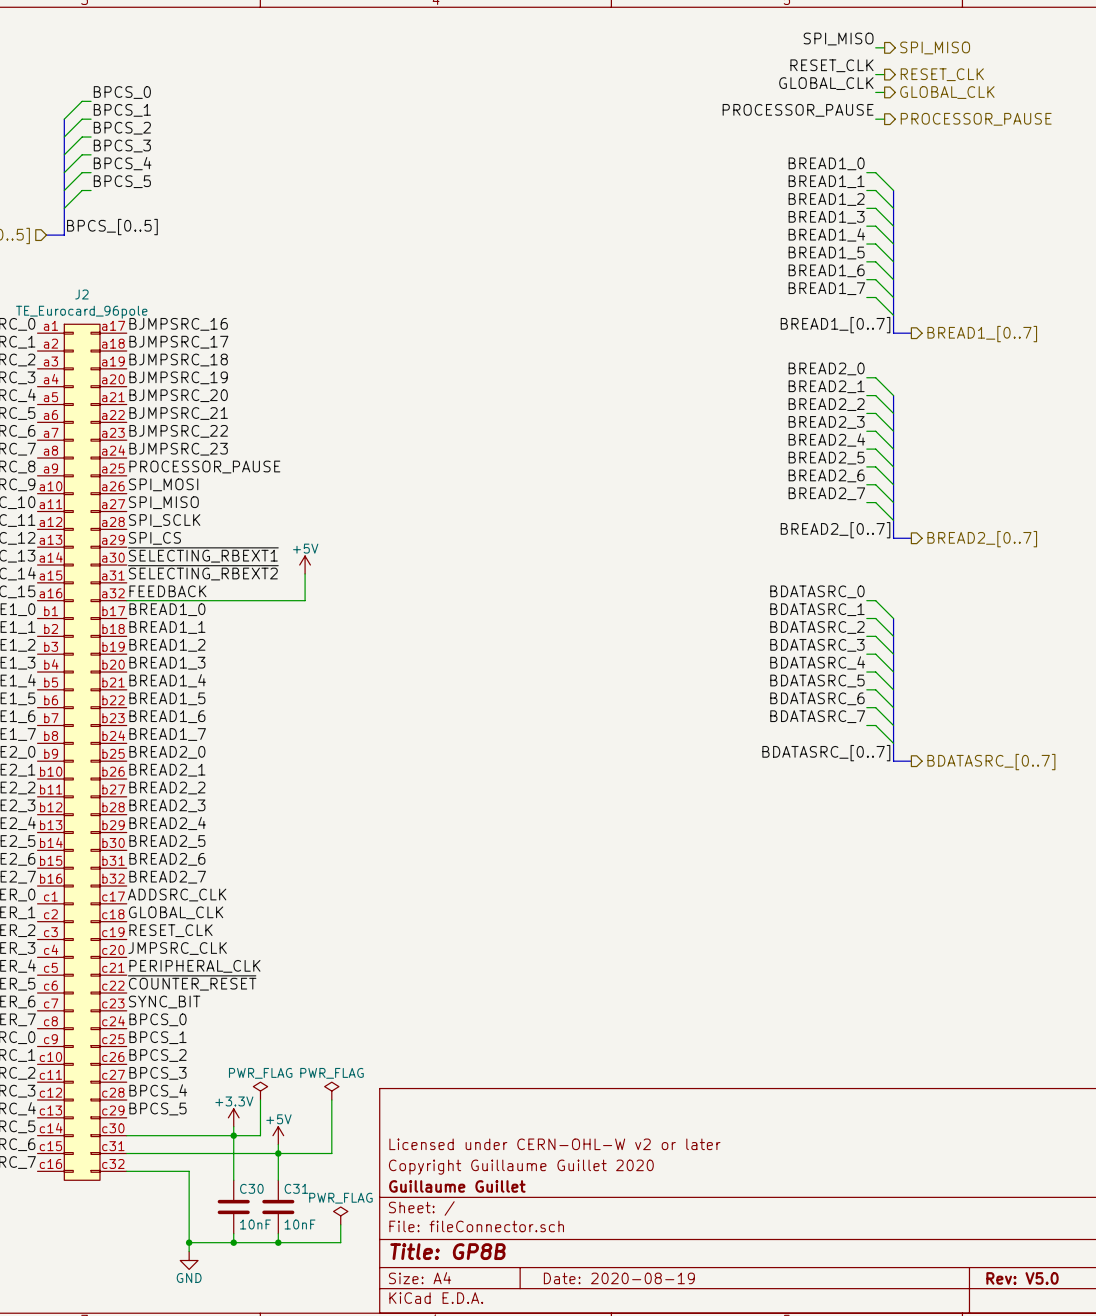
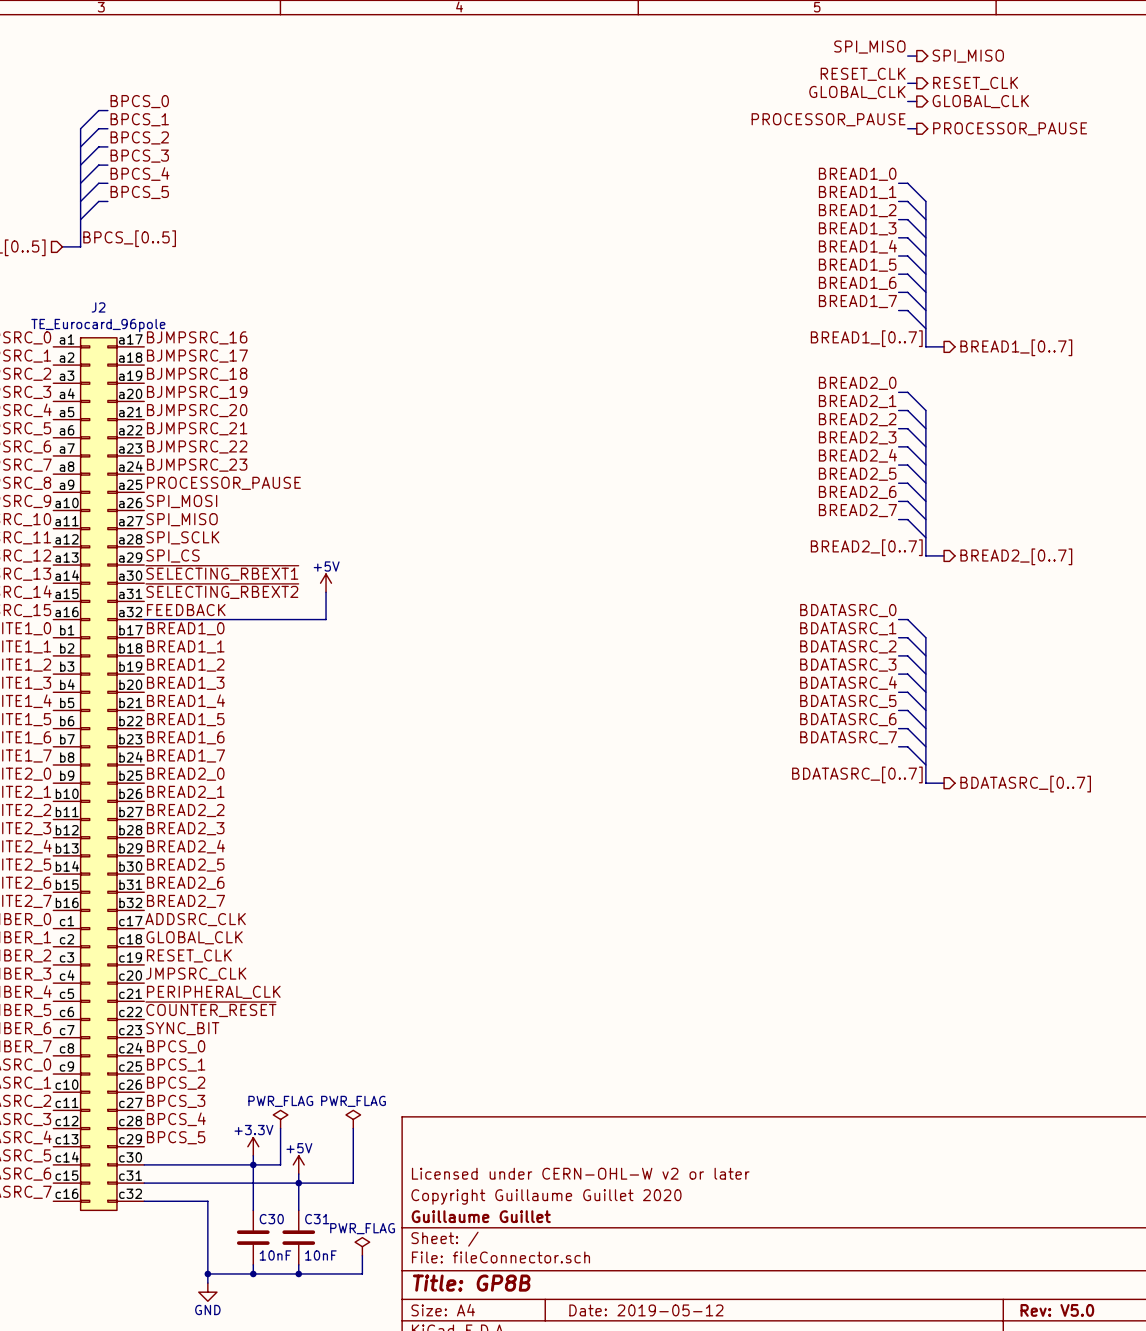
title block: Date: 2020-08-19 (619, 1278) -> Date: 2019-05-12 (646, 1310)

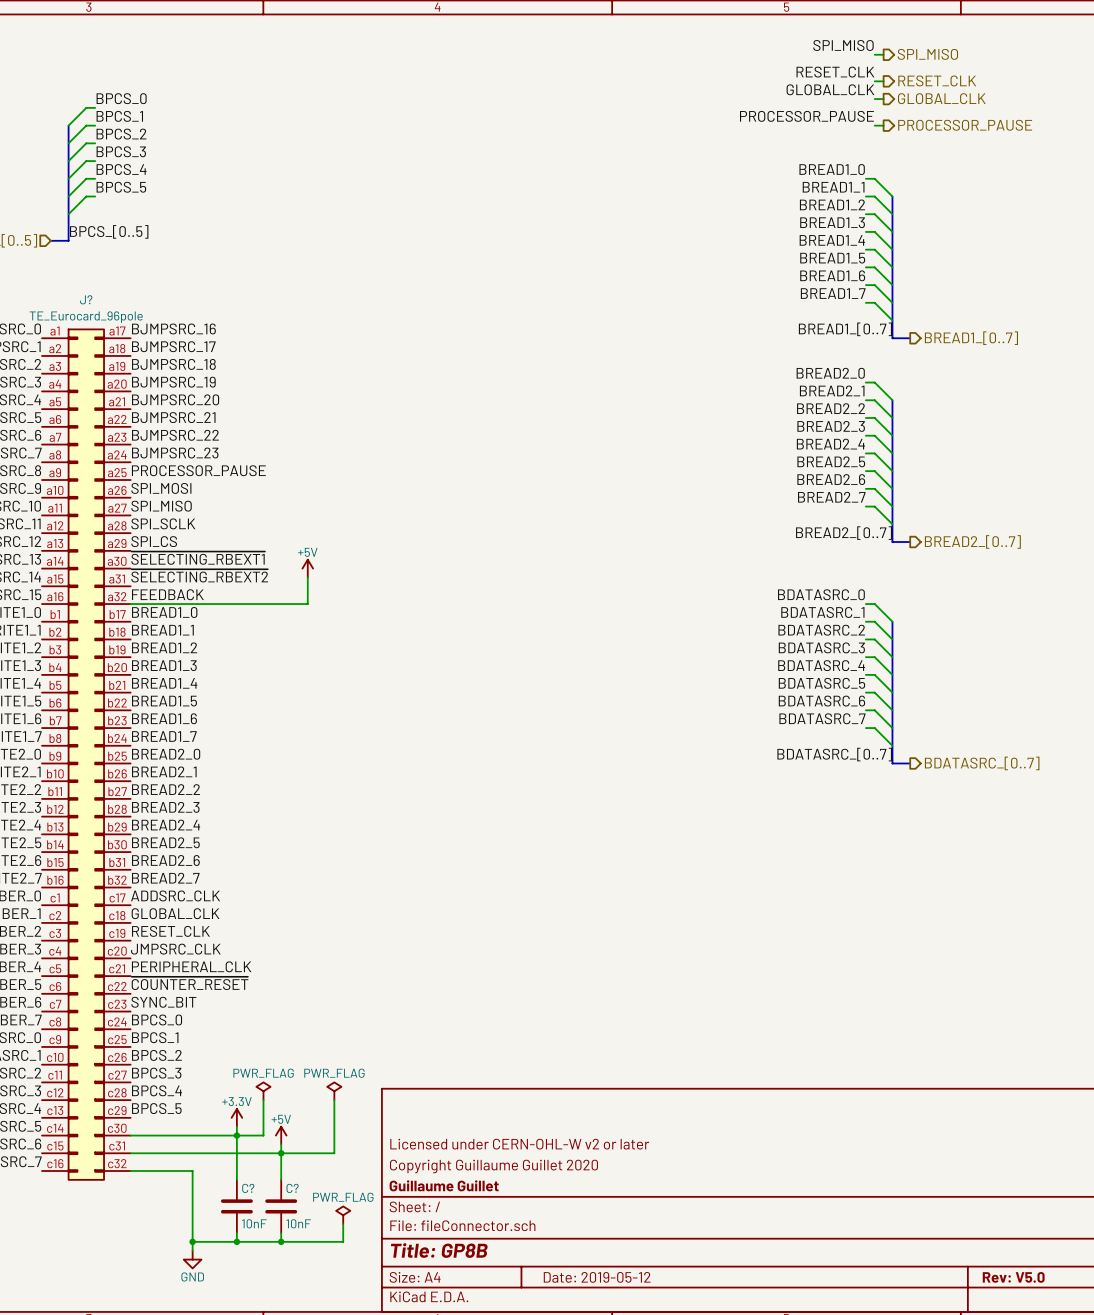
J2 name: J2 (98, 307) -> J? (86, 299)
C30 name: C30 (271, 1219) -> C? (248, 1188)
C31 name: C31 (317, 1219) -> C? (292, 1188)

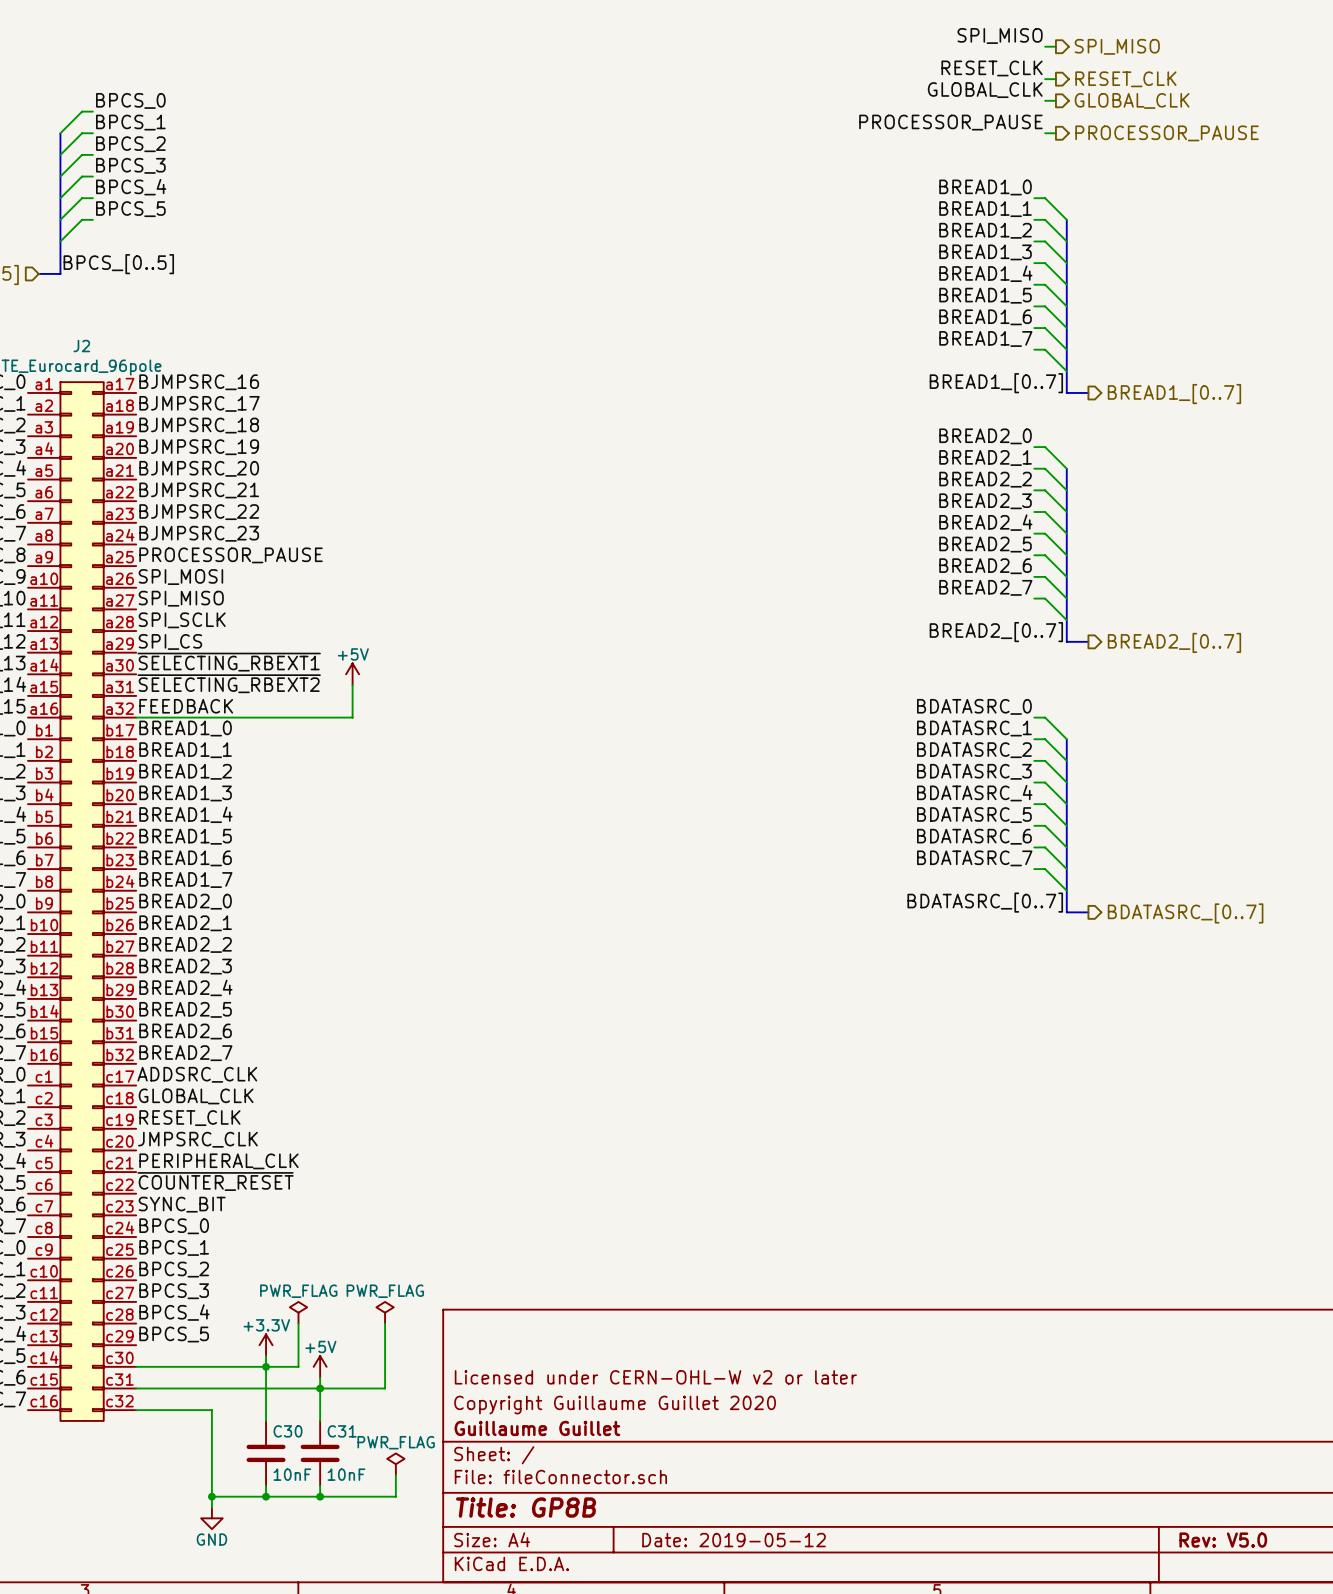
J? name: J? (86, 299) -> J2 (81, 346)
C? name: C? (248, 1188) -> C30 (288, 1431)
C? name: C? (292, 1188) -> C31 (342, 1431)

